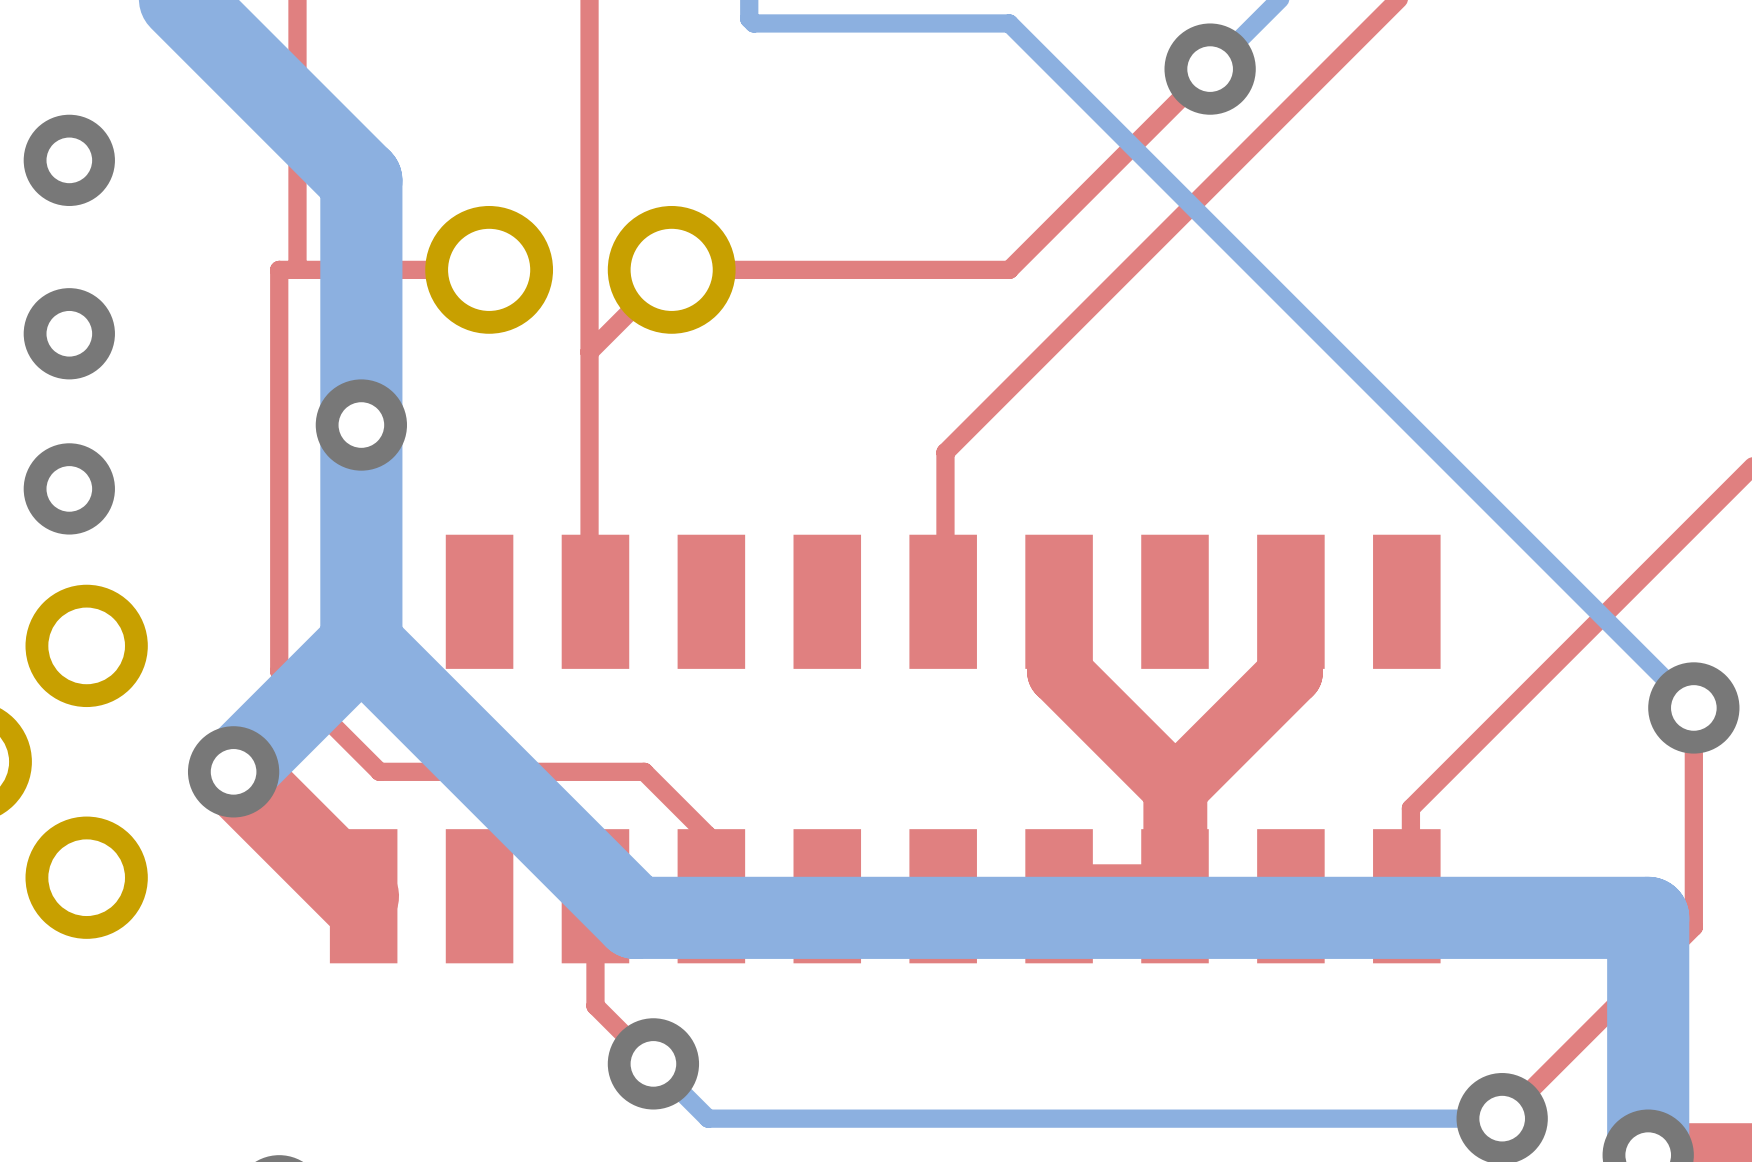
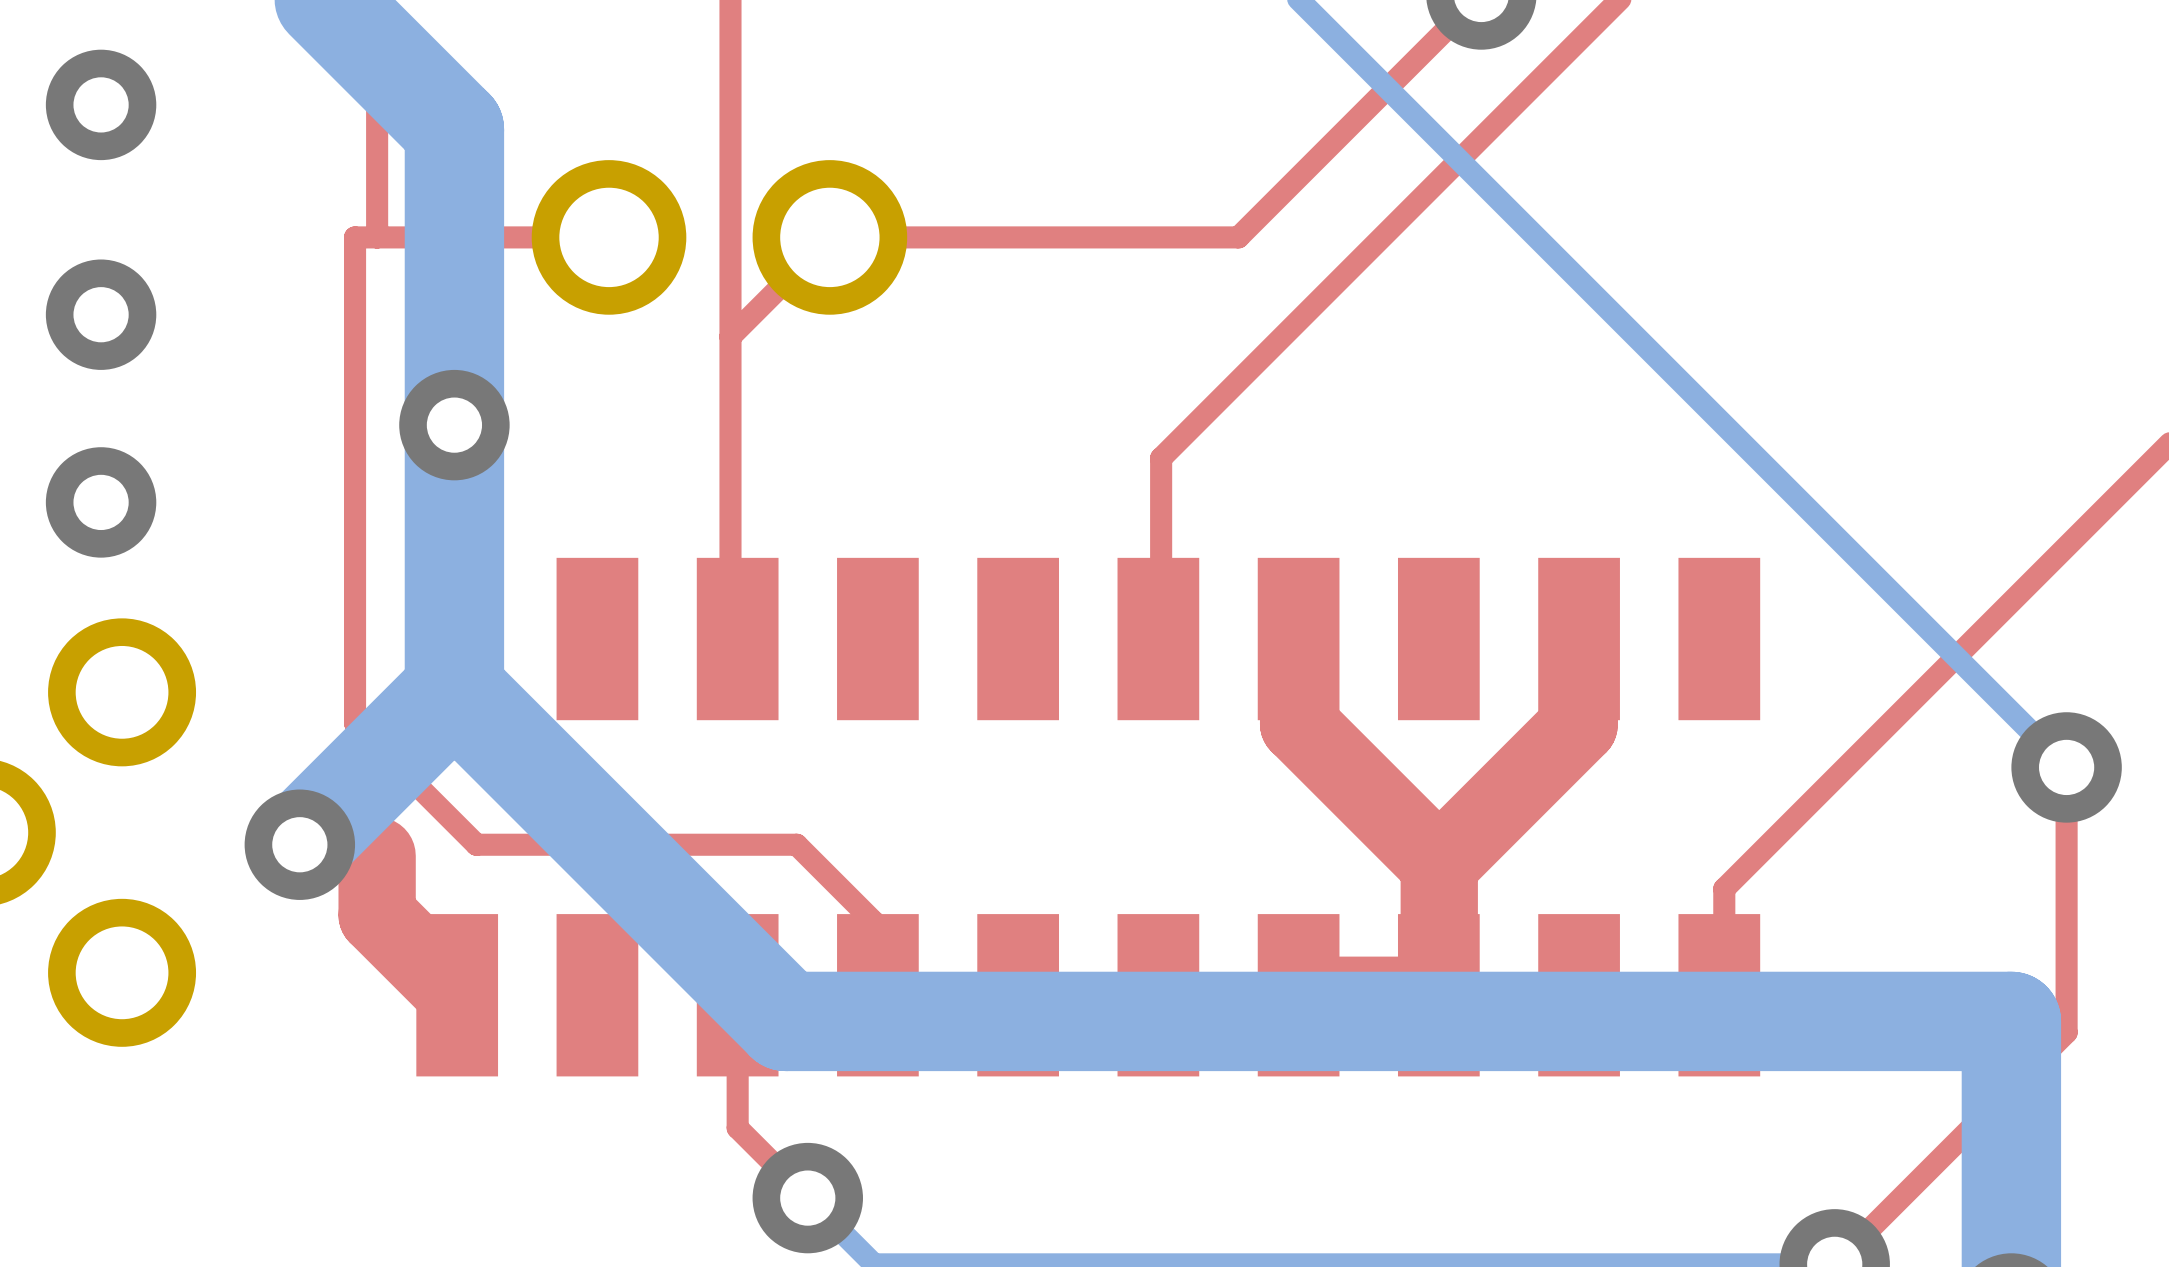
top track: (242, 780) (233, 771) (357, 896) (363, 896) -> (299, 844) (377, 855) (377, 915) (457, 995)

